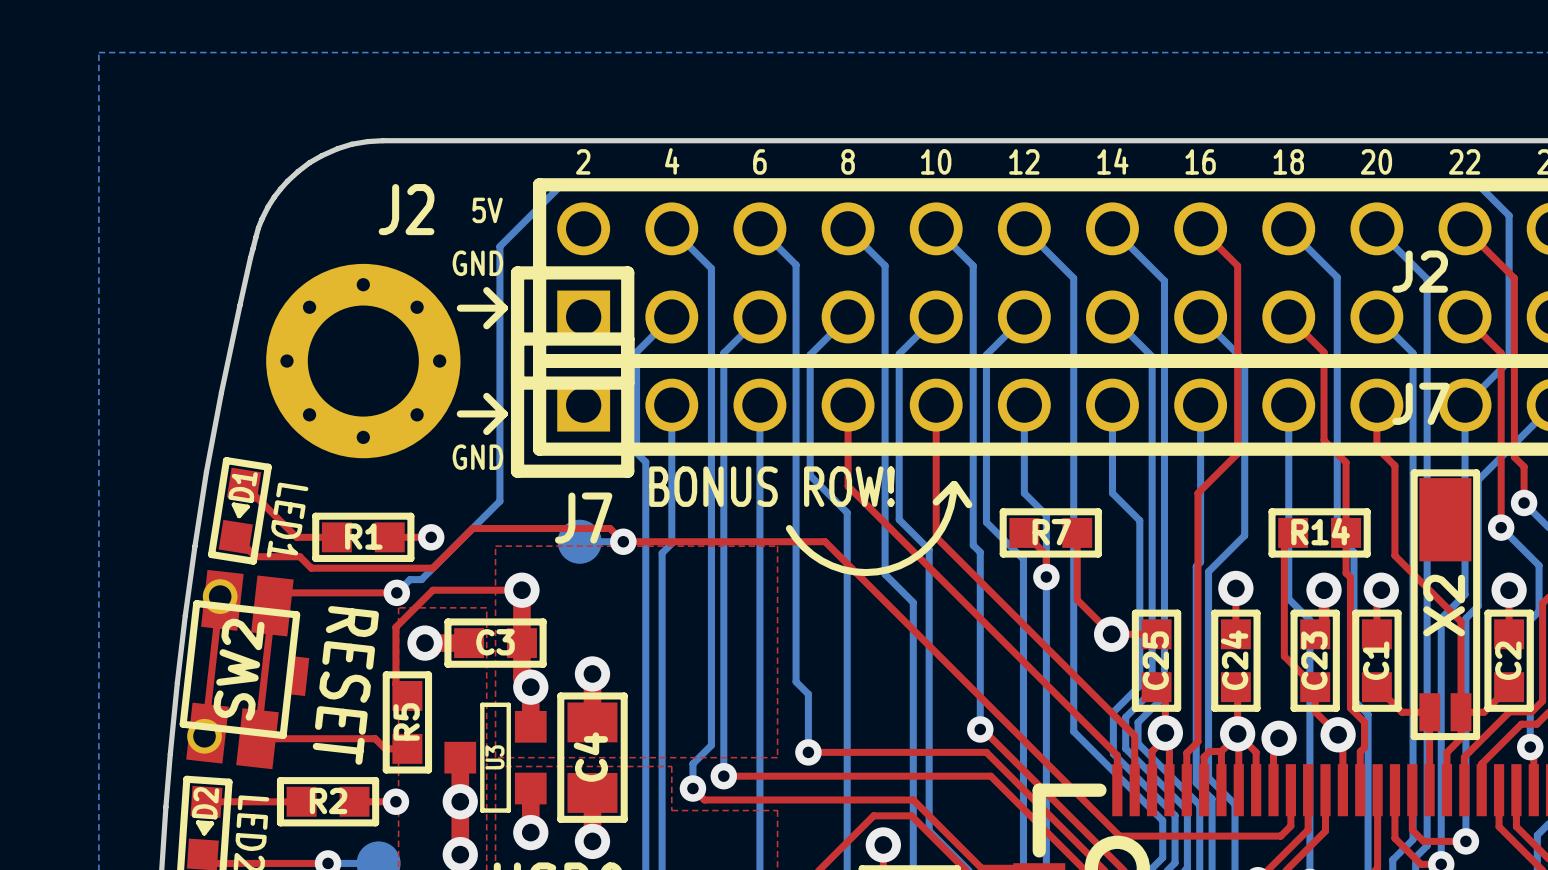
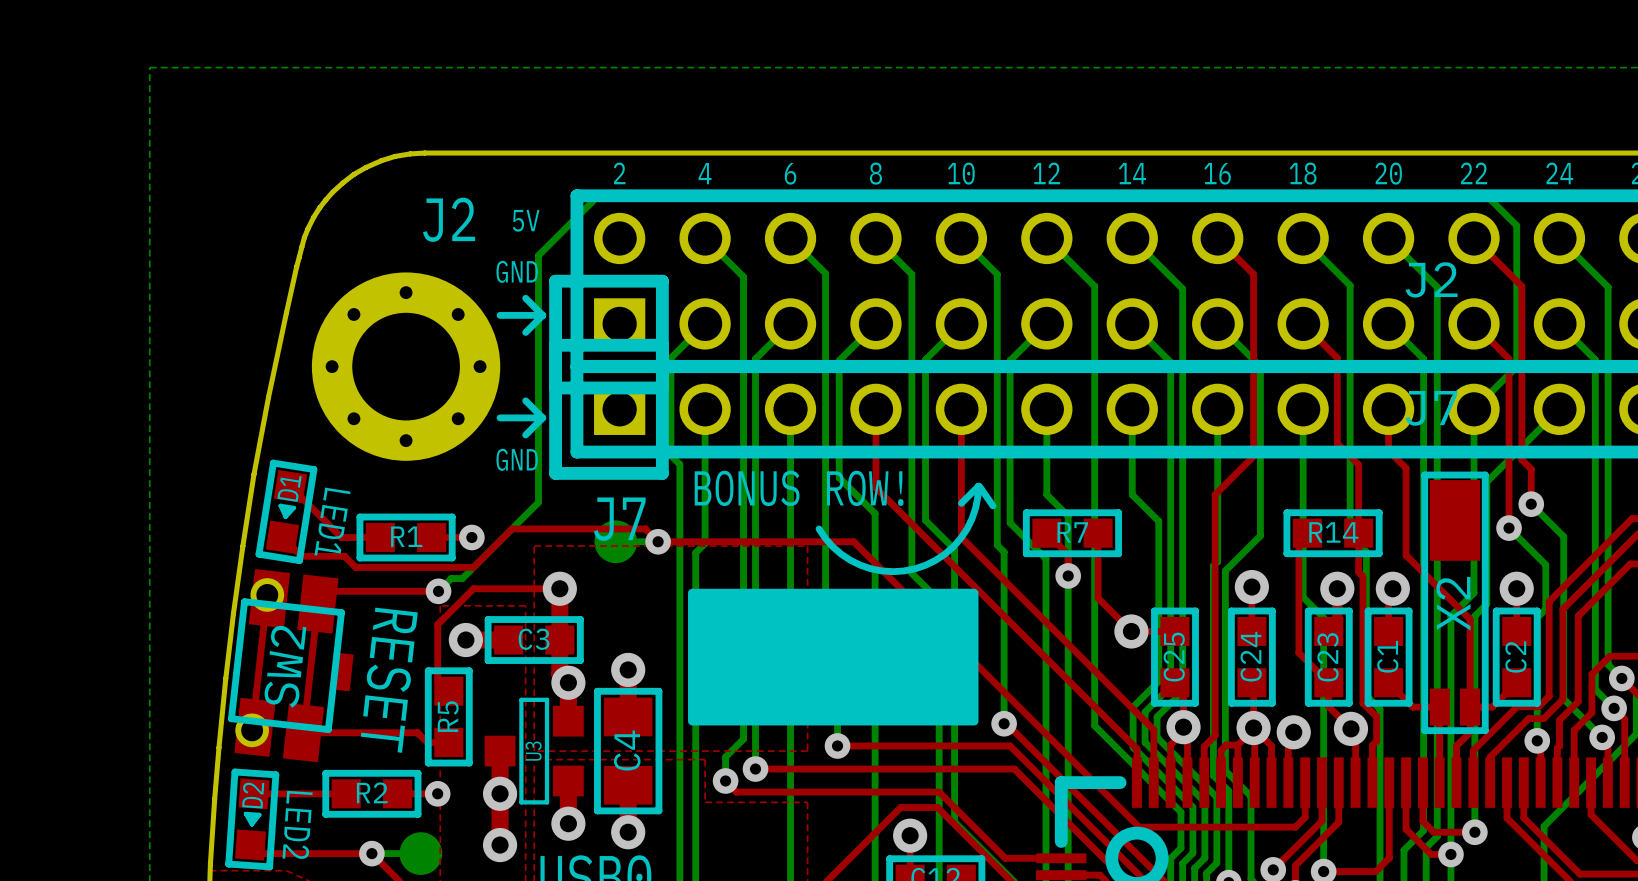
drawing: none -> [688, 588, 979, 726]

